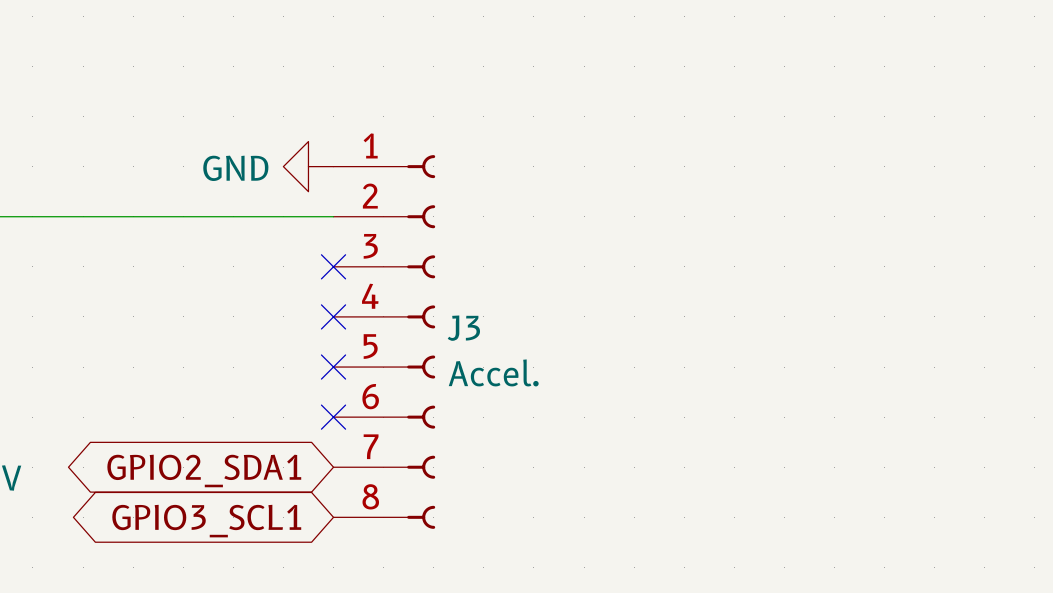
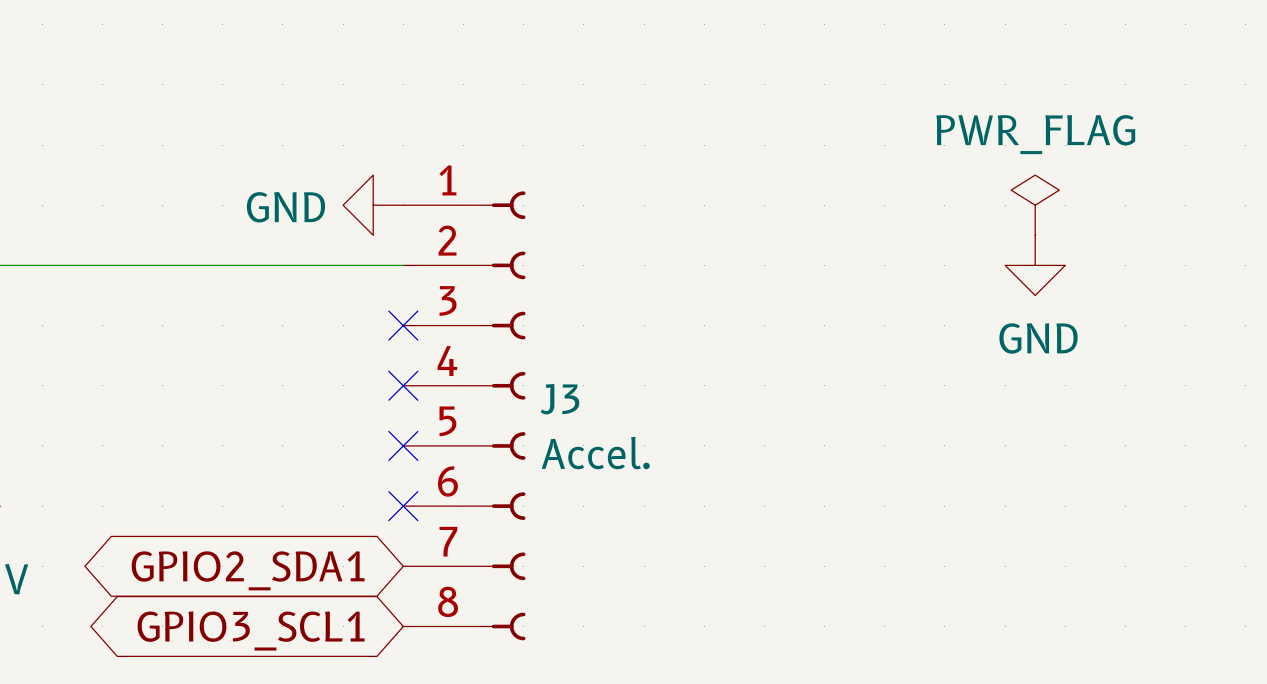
power symbol: none -> PWR_FLAG (1035, 205)
power symbol: none -> GND (1035, 265)

